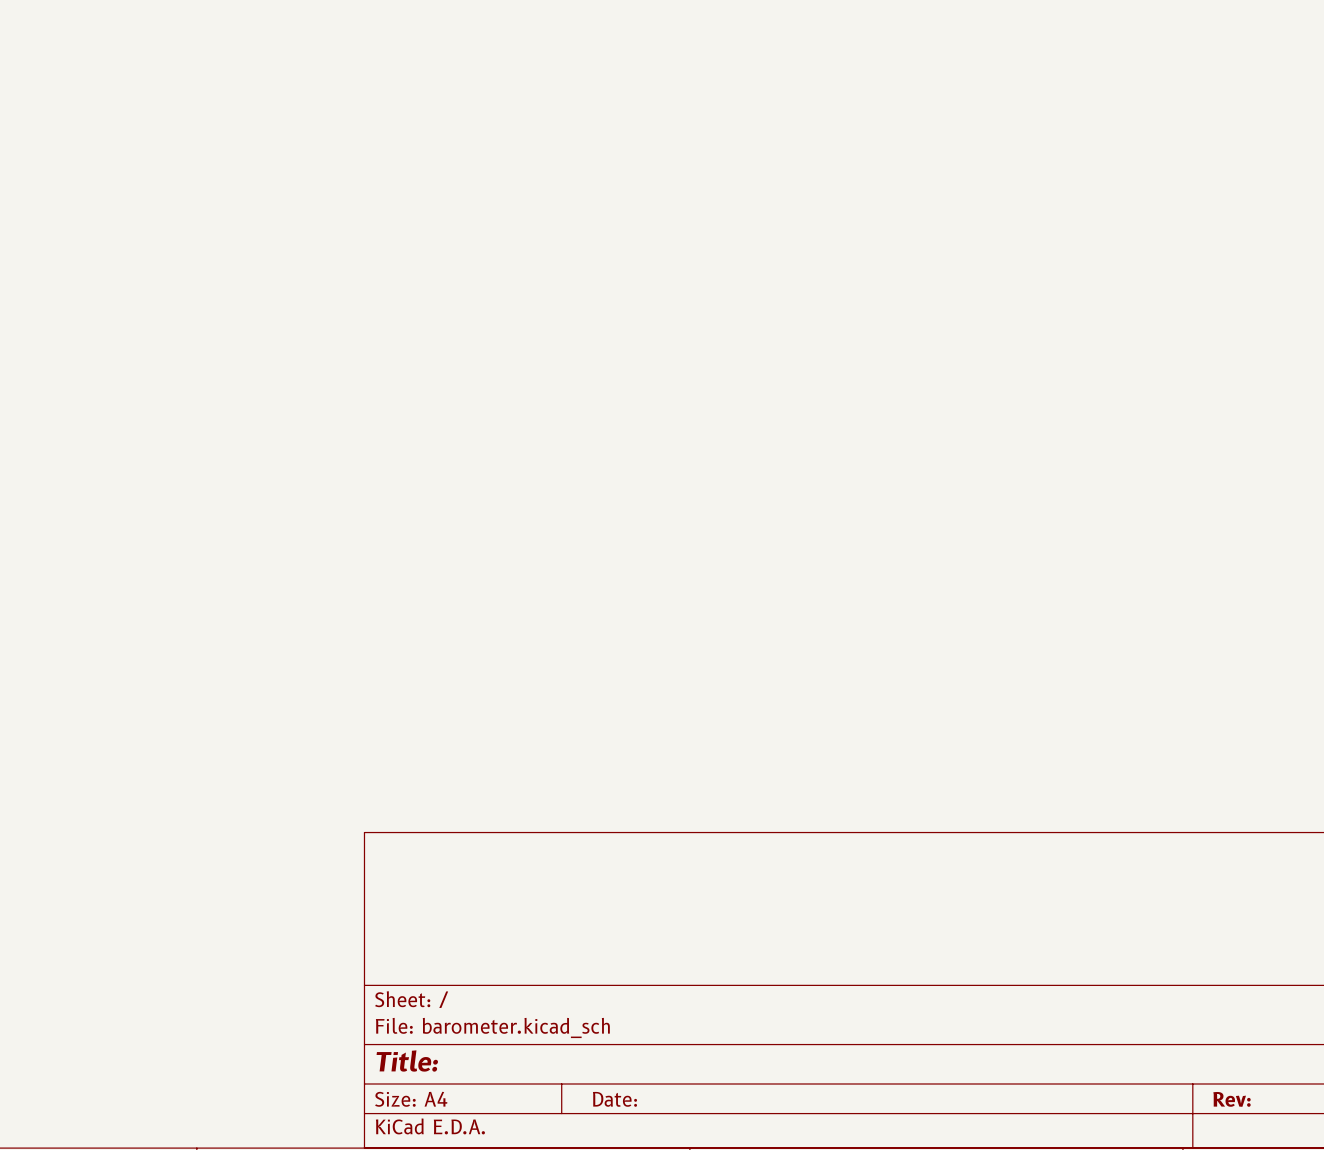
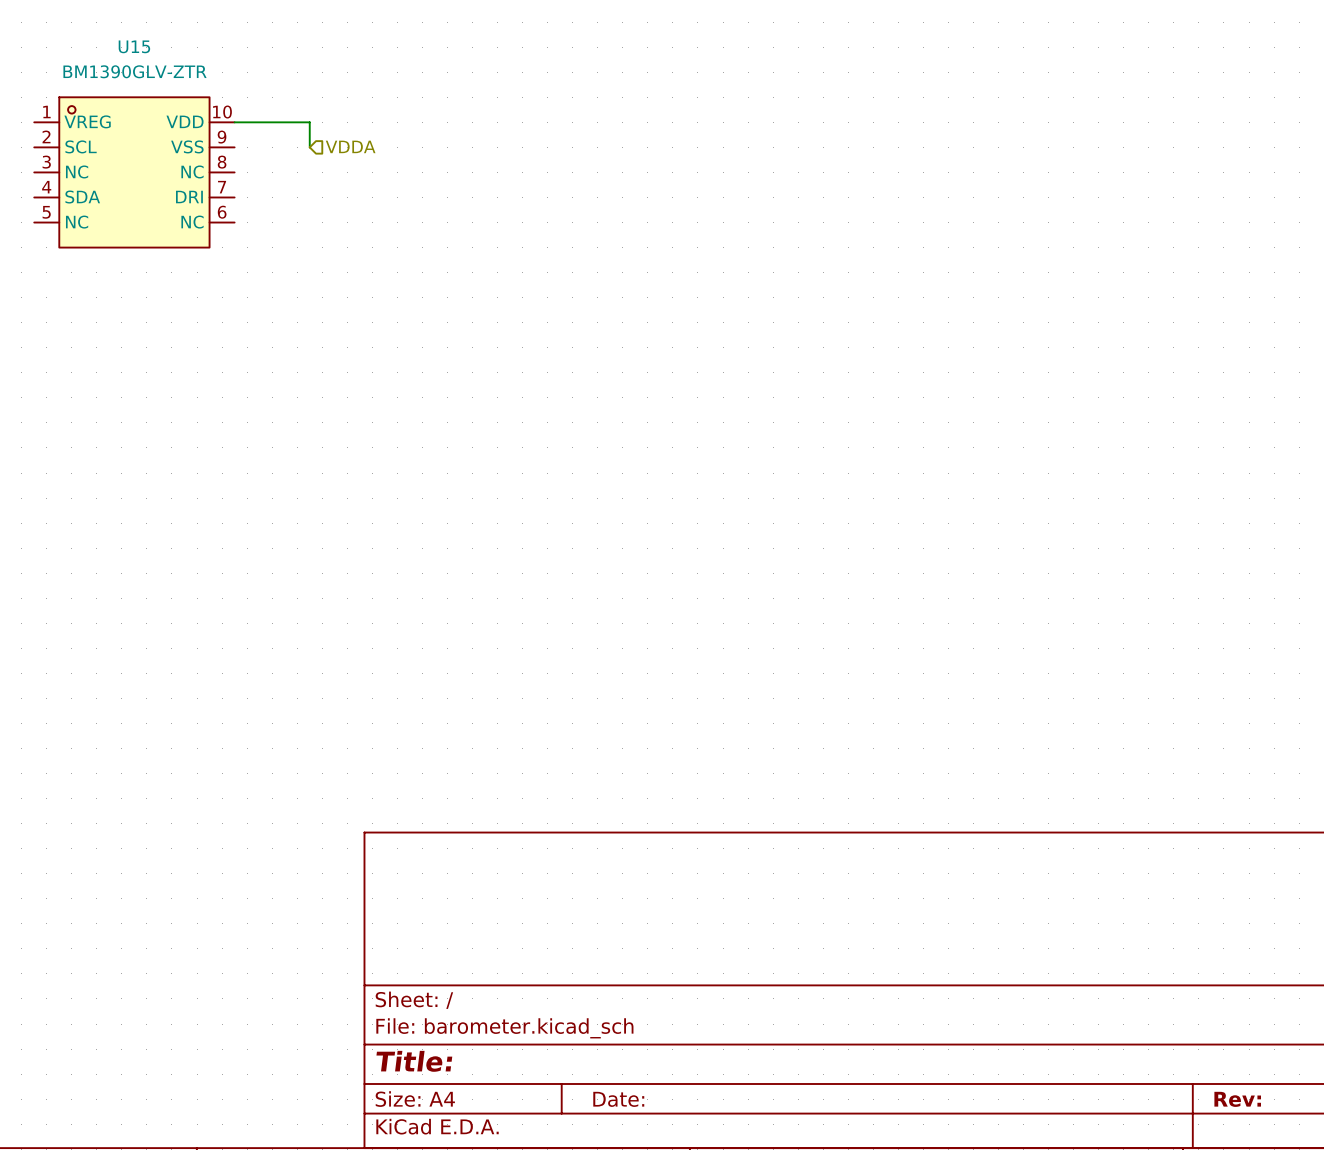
wire: none -> (234, 122) (309, 122) (309, 147)
hierarchical label: none -> VDDA (350, 146)
U15: none -> BM1390GLV-ZTR (134, 172)

